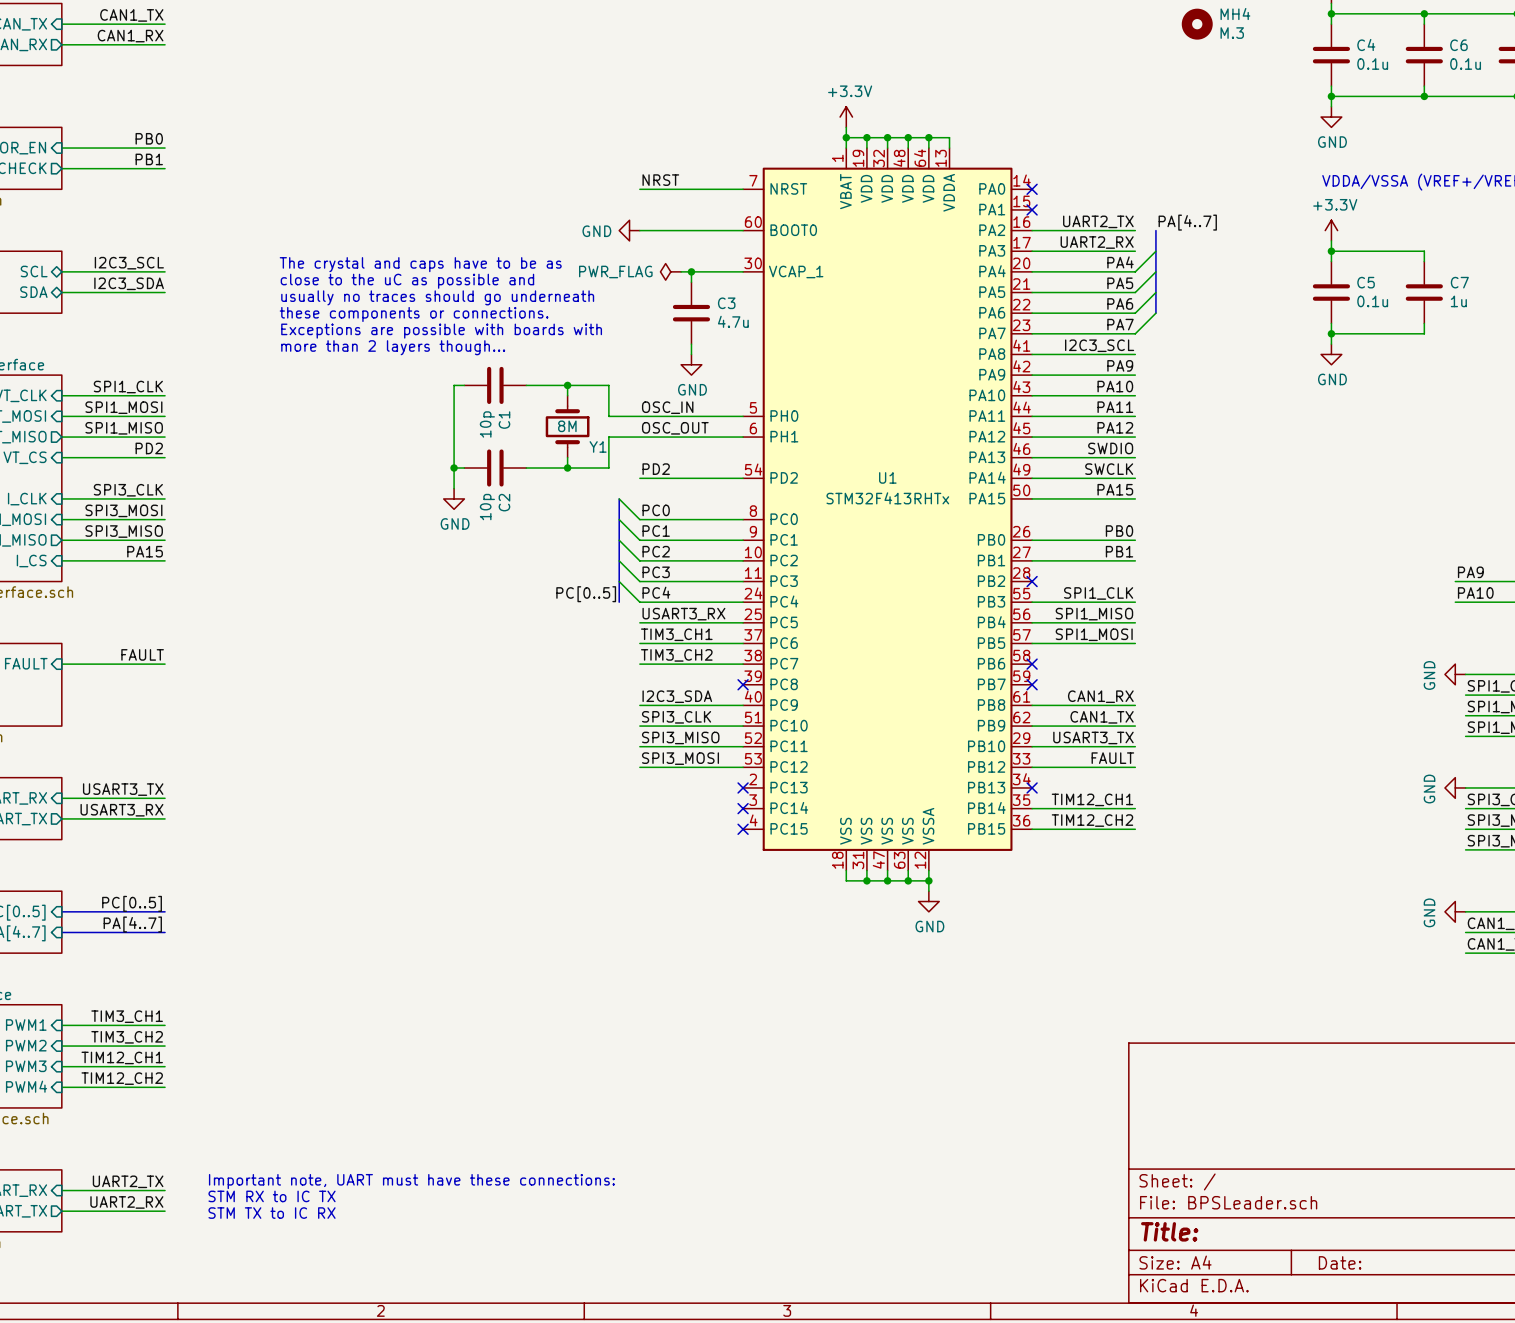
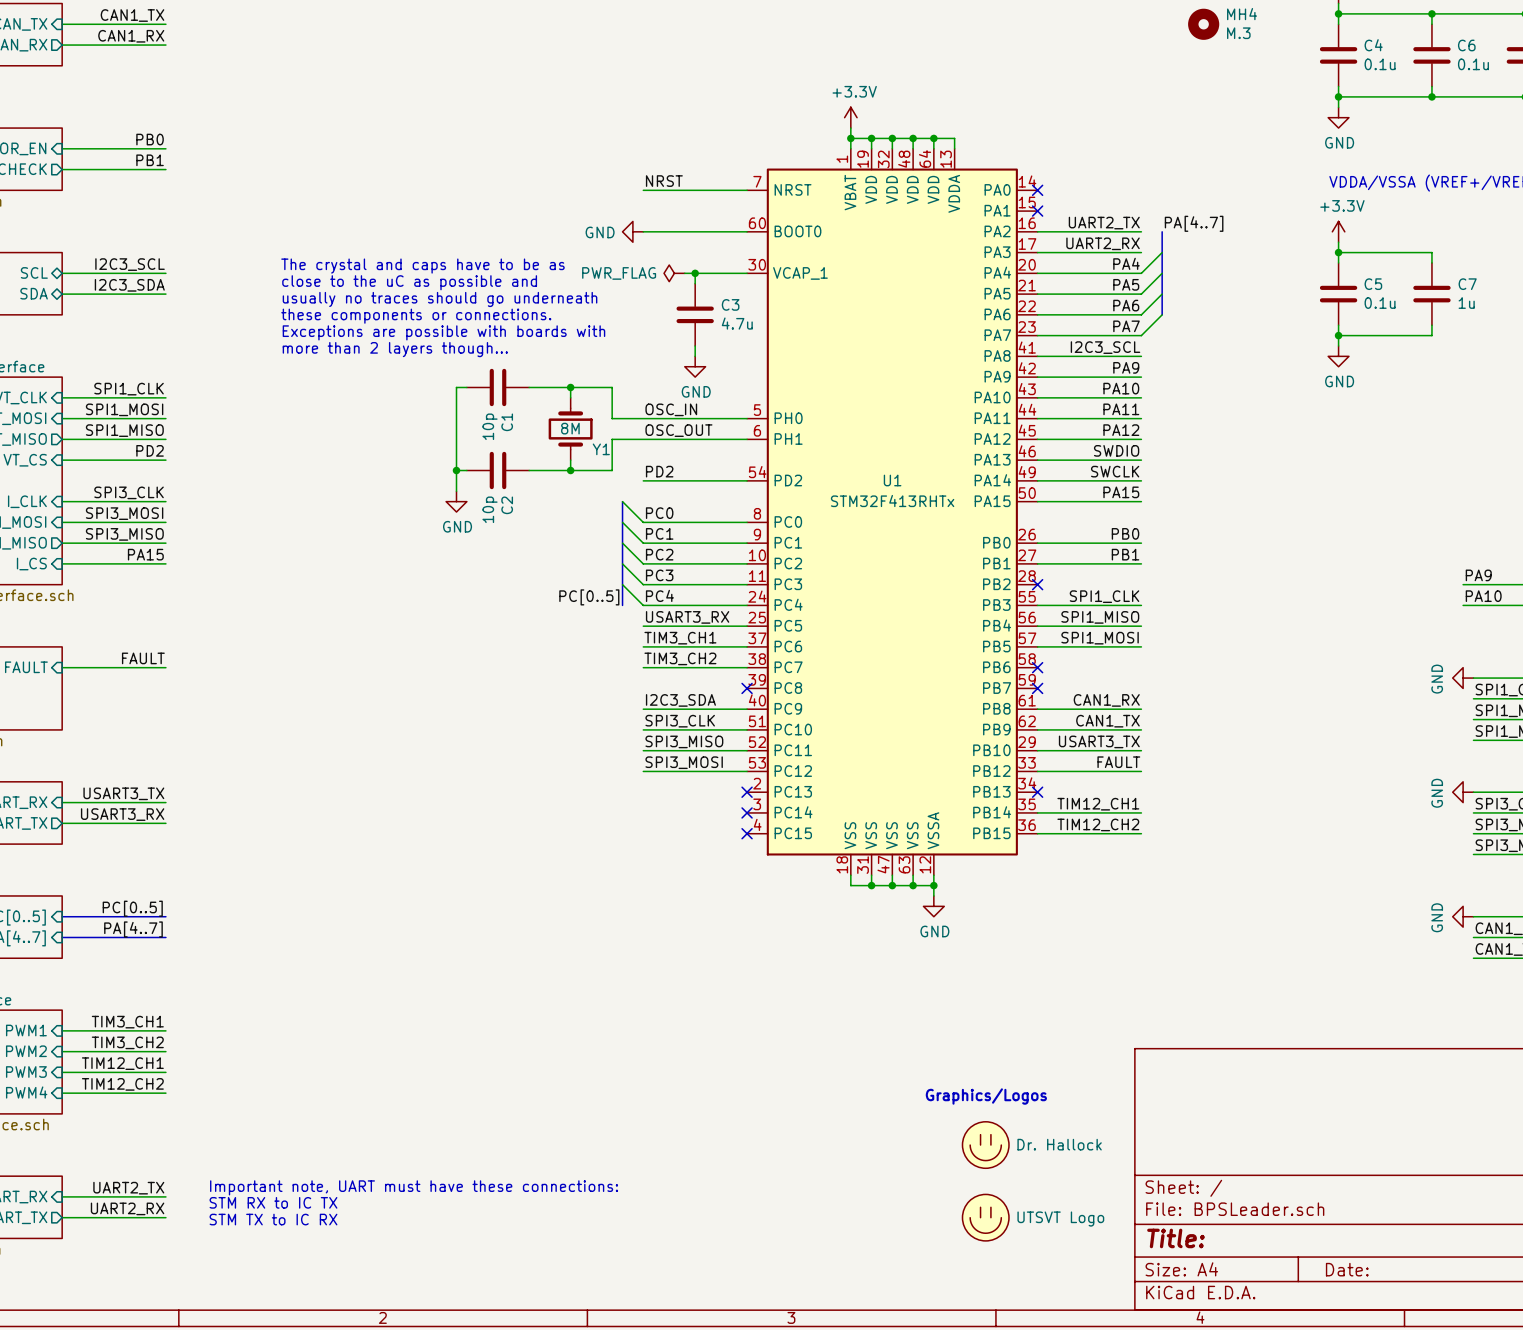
text: none -> Graphics/Logos (986, 1096)
part: none -> Dr. Hallock (985, 1145)
part: none -> UTSVT Logo (985, 1217)

